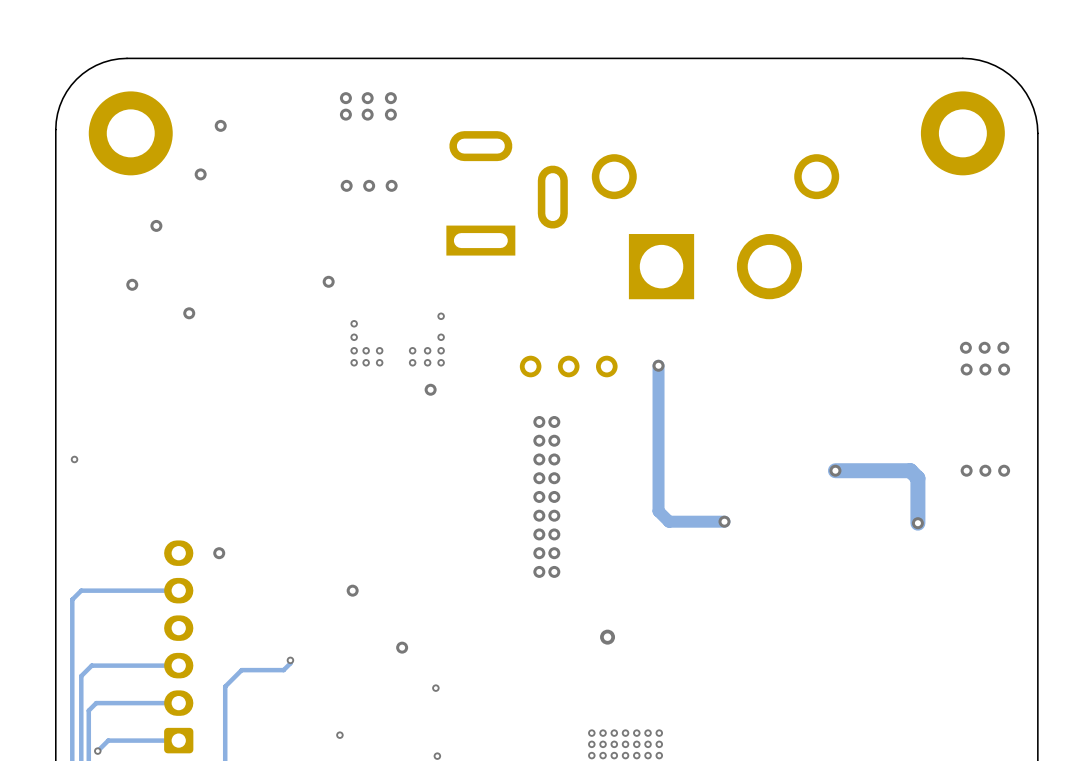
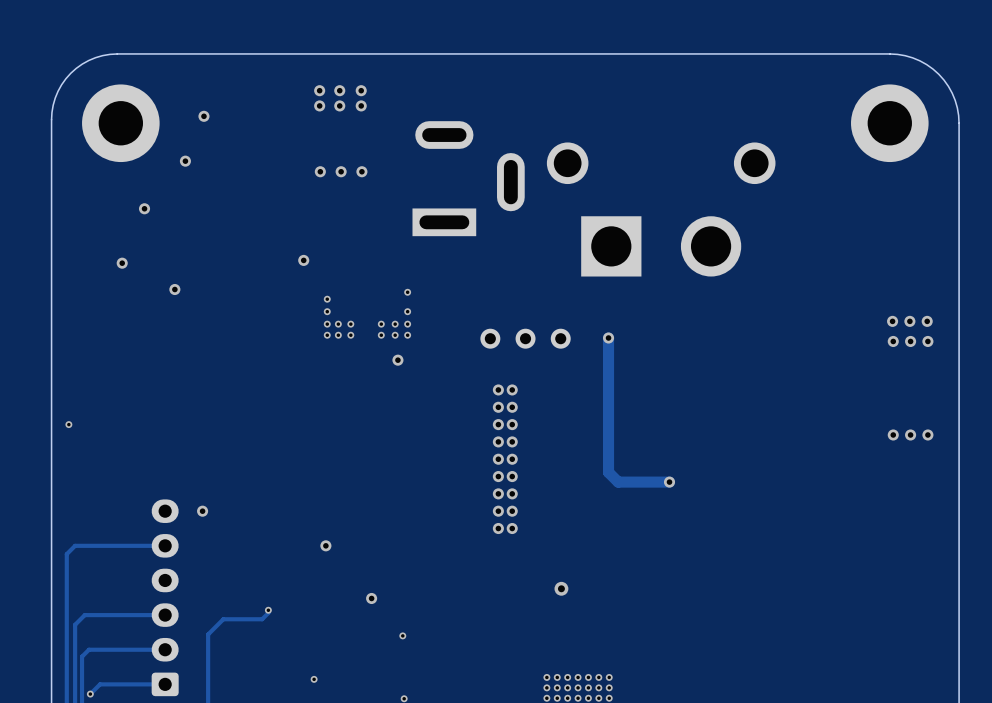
track: (835, 470) (910, 470) (917, 478) (917, 523) -> none
via: (835, 470) -> none
via: (917, 523) -> none

